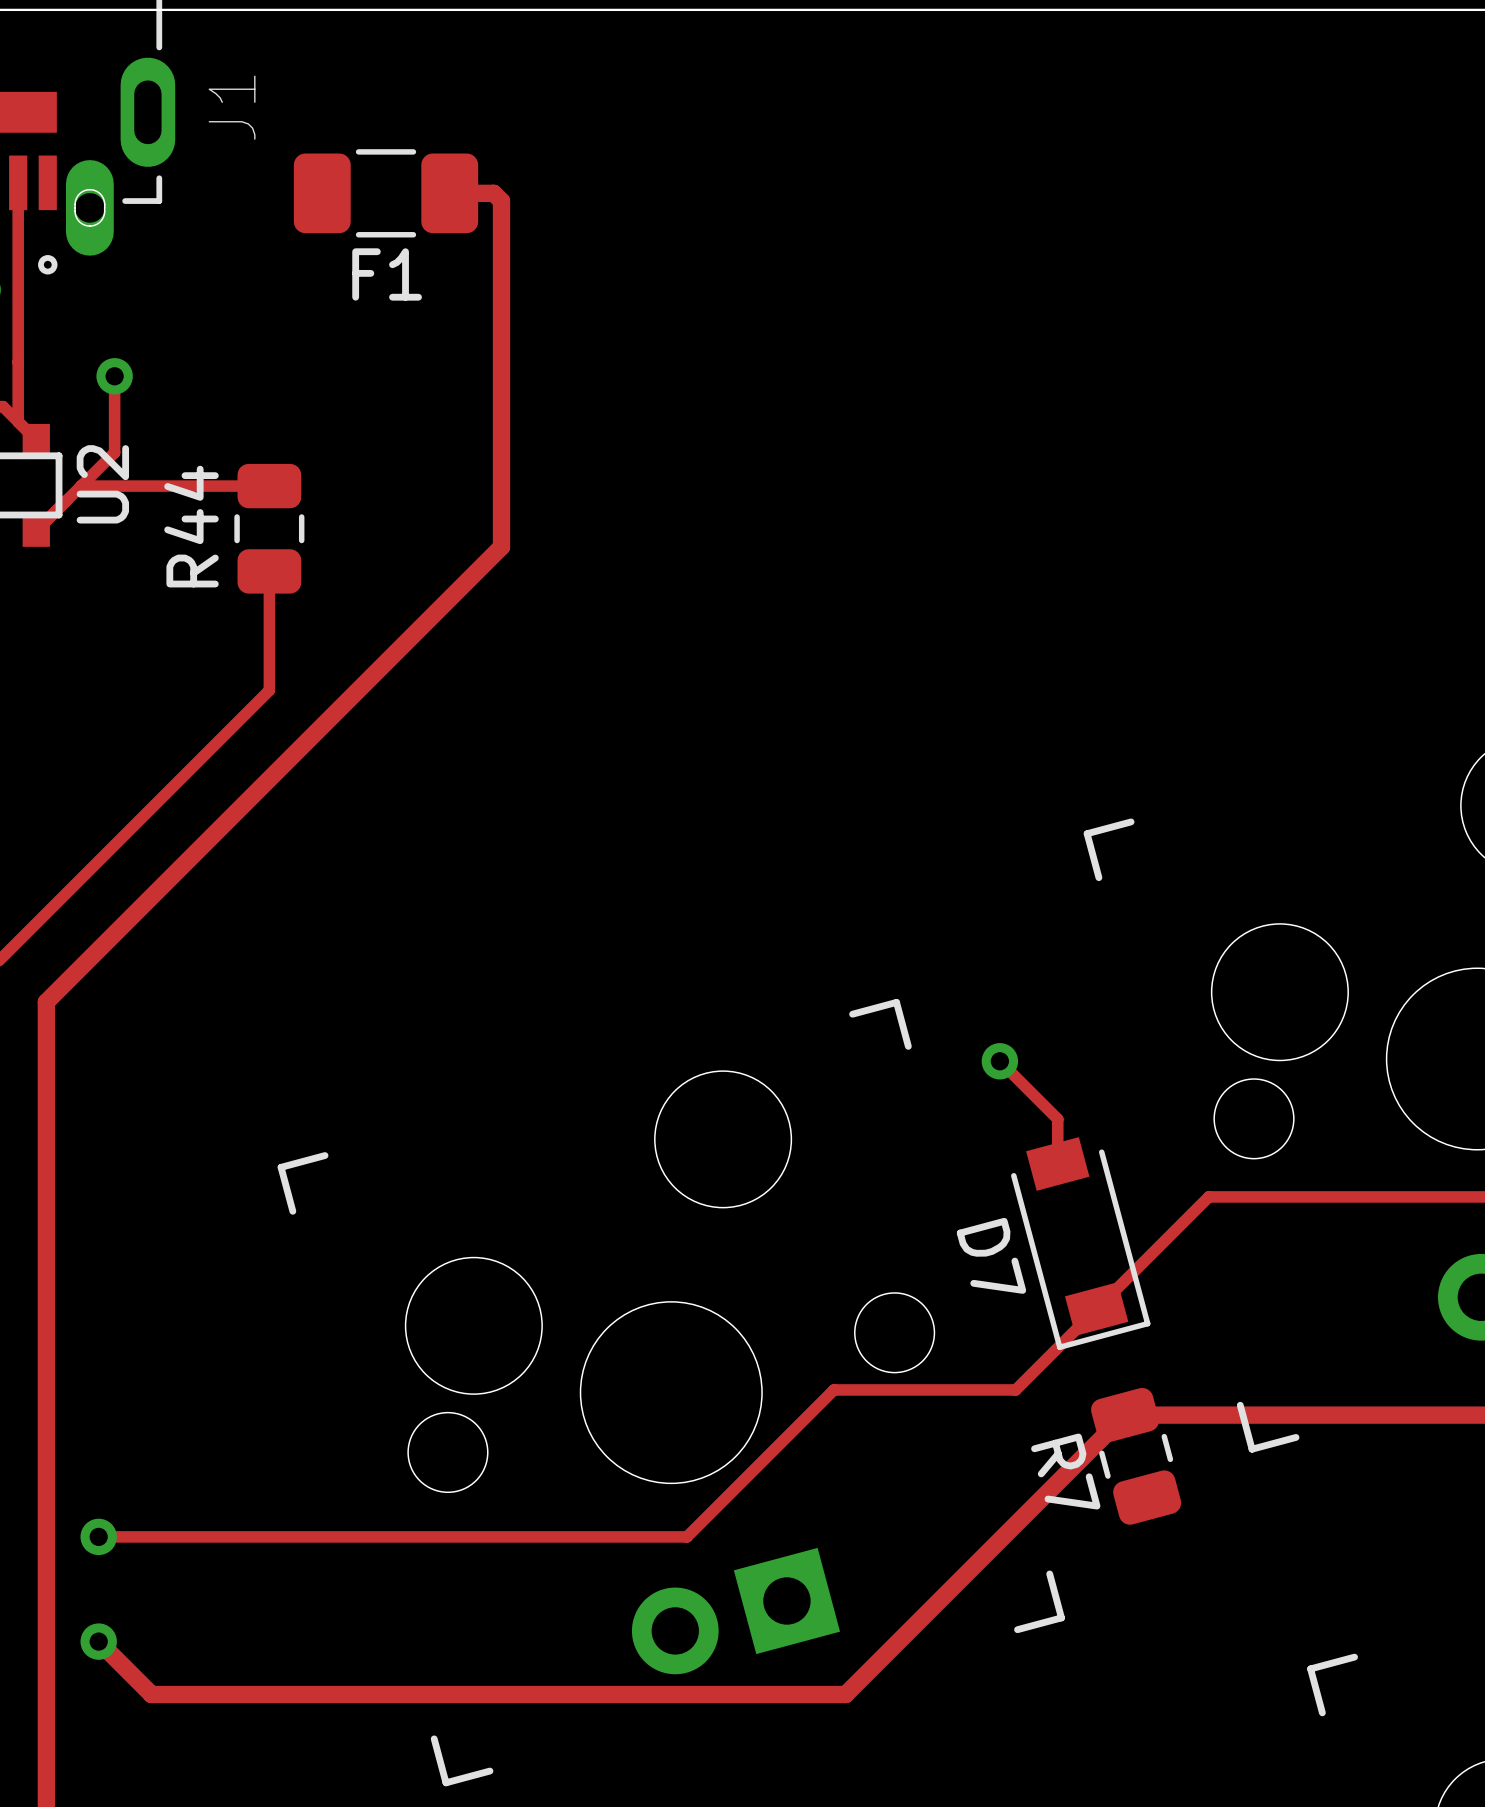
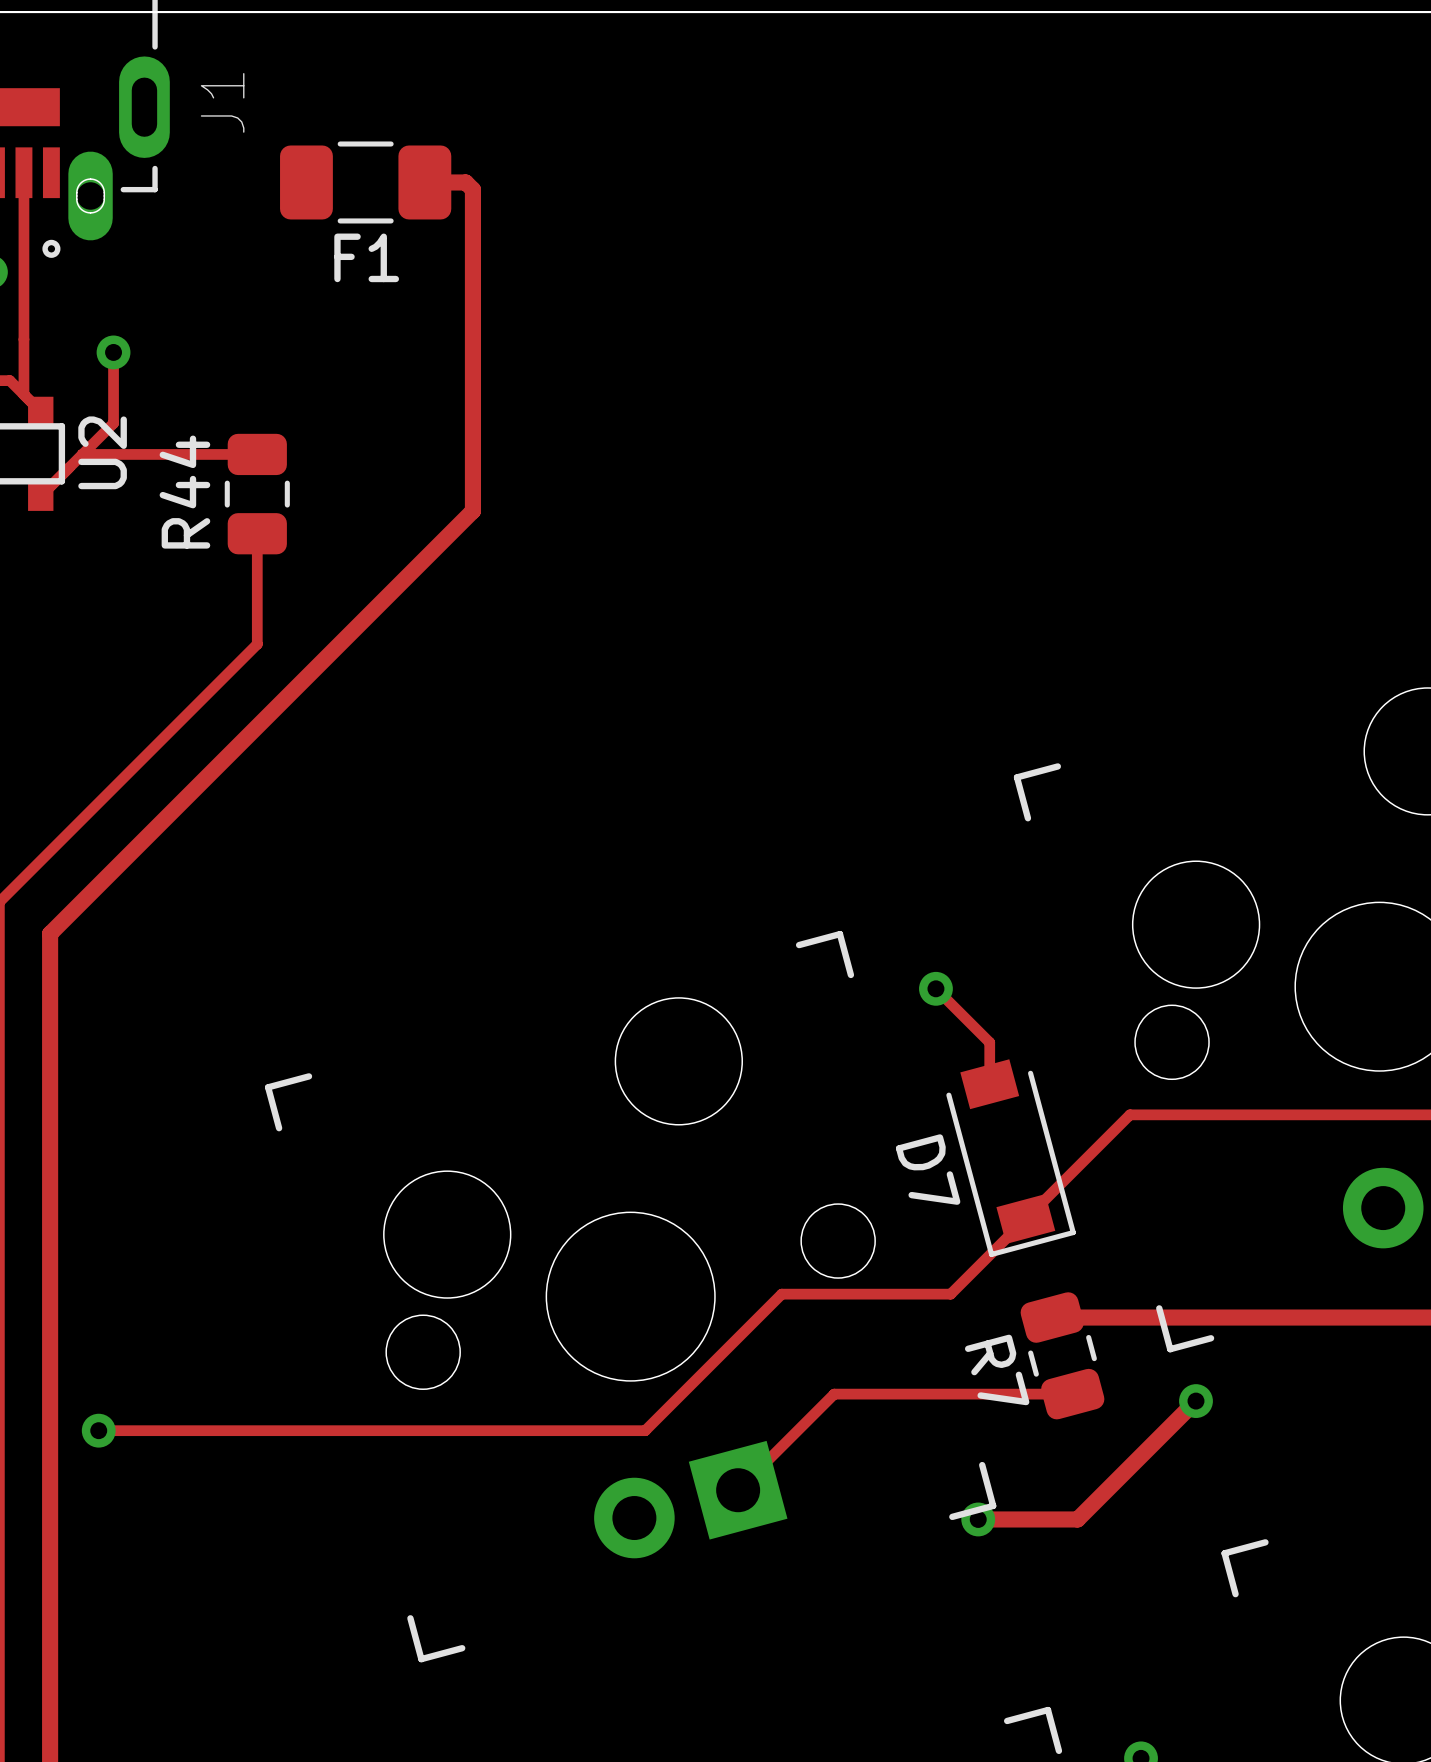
track: (1125, 1415) (845, 1694) (151, 1694) (98, 1641) -> none
track: none -> (1072, 1394) (834, 1394) (738, 1490)
track: none -> (1196, 1401) (1077, 1519) (978, 1519)
via: none -> (1196, 1401)
via: none -> (978, 1519)
via: (98, 1641) -> none

